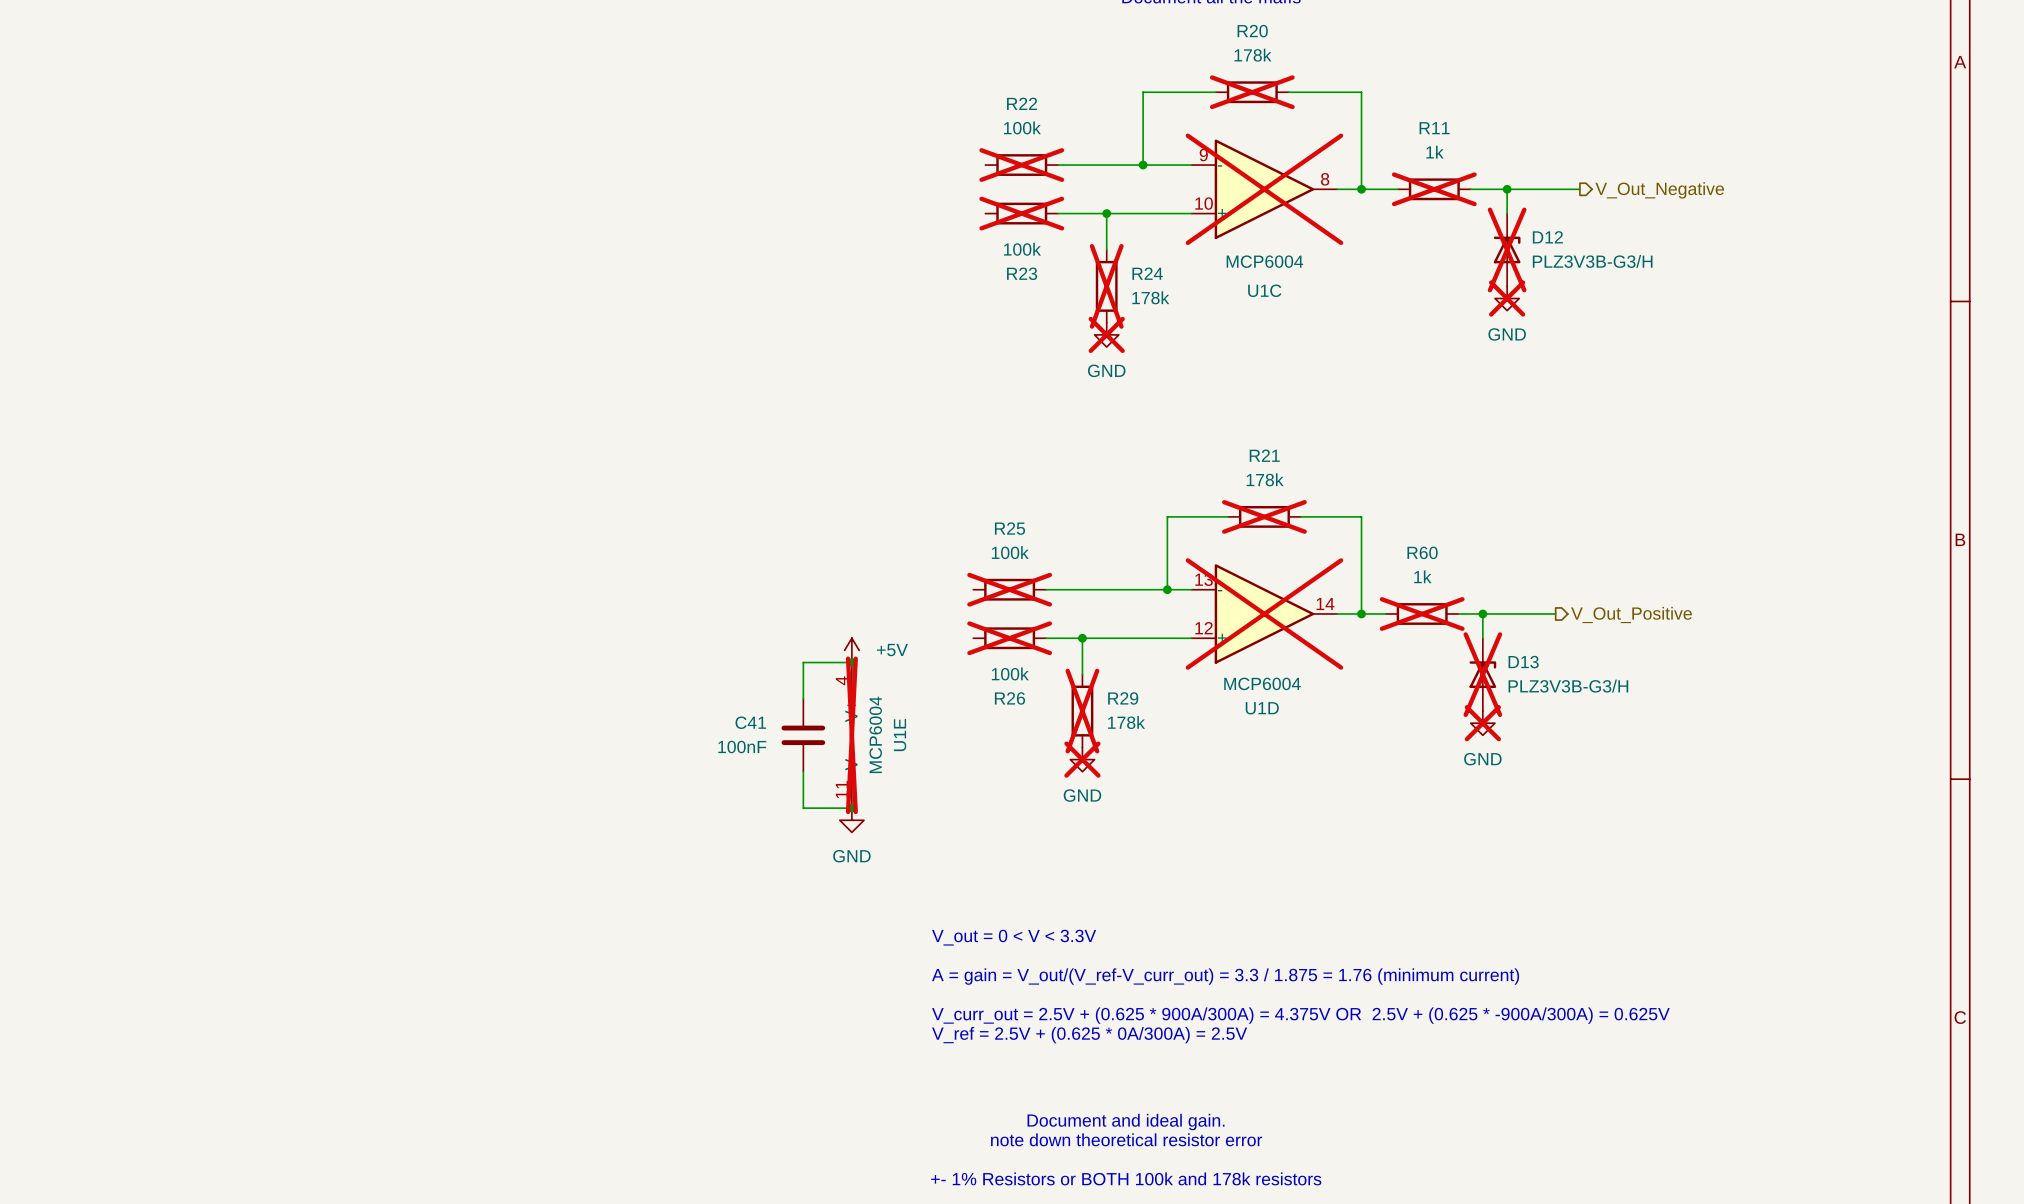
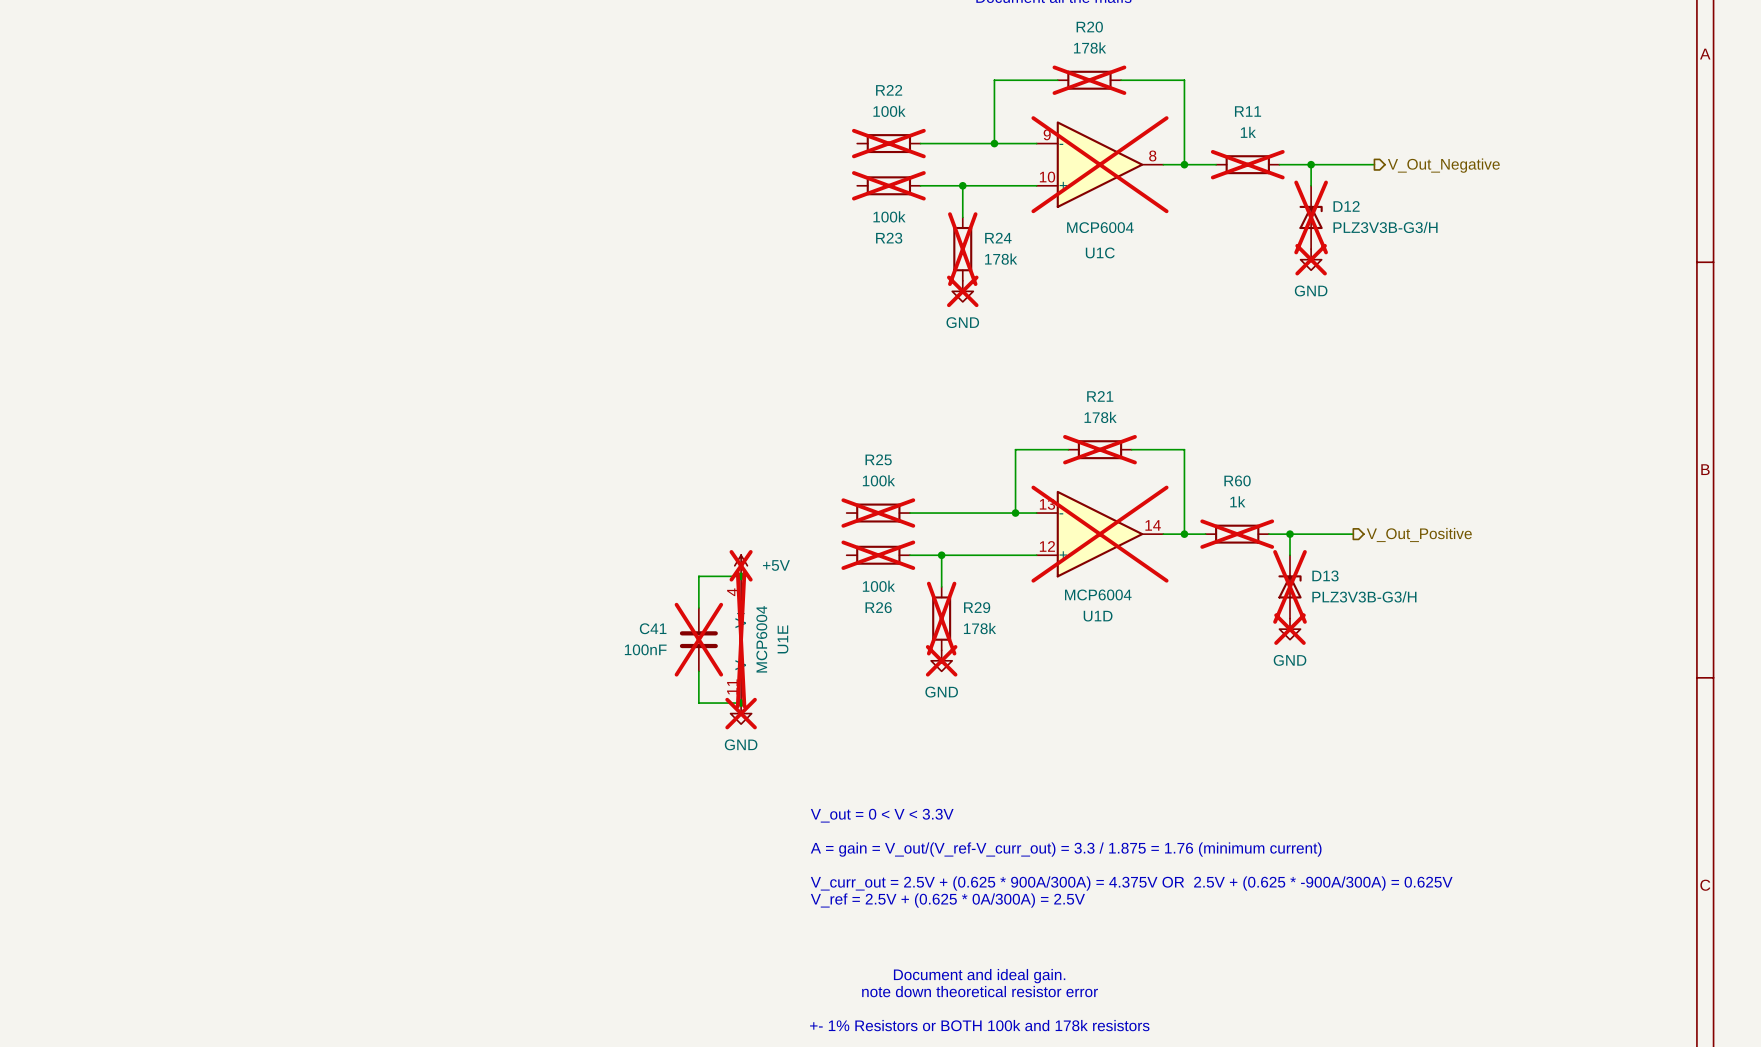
power symbol do-not-place cross: none -> (741, 565)
C41 do-not-place cross: none -> (698, 639)
power symbol do-not-place cross: none -> (741, 713)

